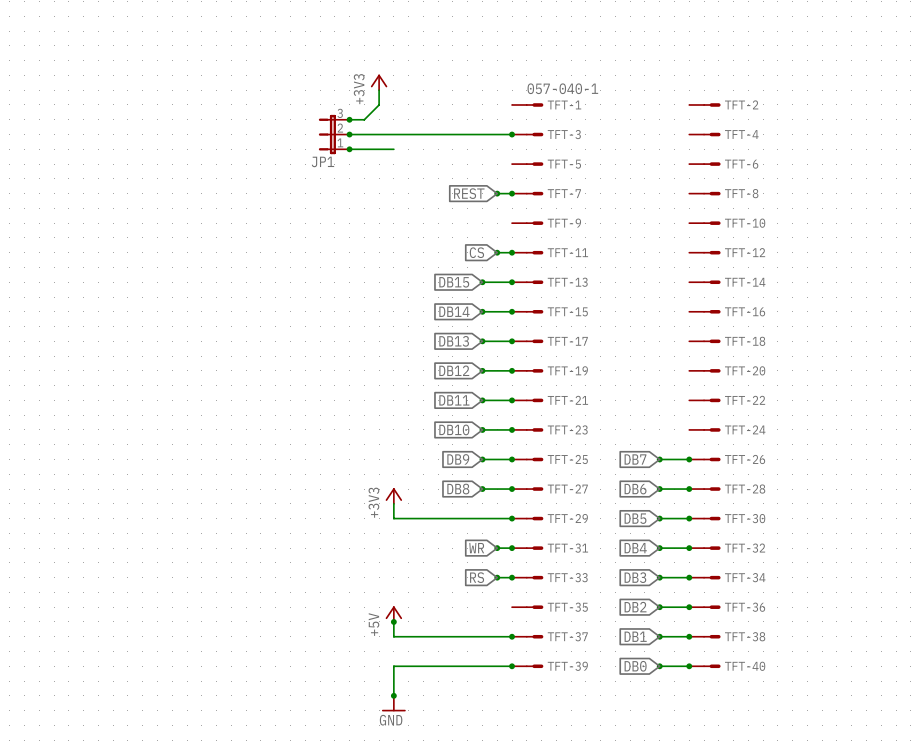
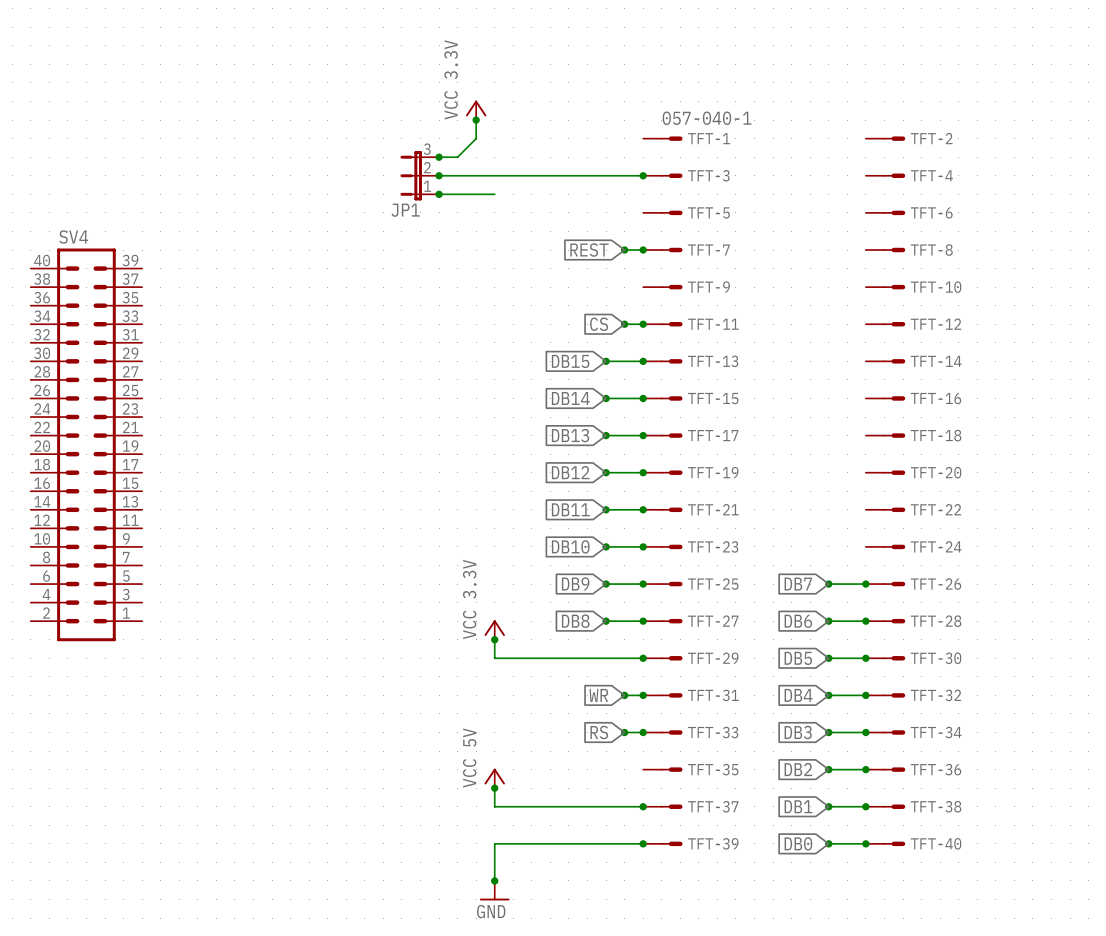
power symbol: +3V3 (379, 82) -> VCC 3.3V (476, 110)
junction: none -> (476, 120)
SV4: none -> (86, 444)
power symbol: +3V3 (393, 496) -> VCC 3.3V (494, 629)
junction: none -> (494, 639)
power symbol: +5V (393, 614) -> VCC 5V (494, 778)

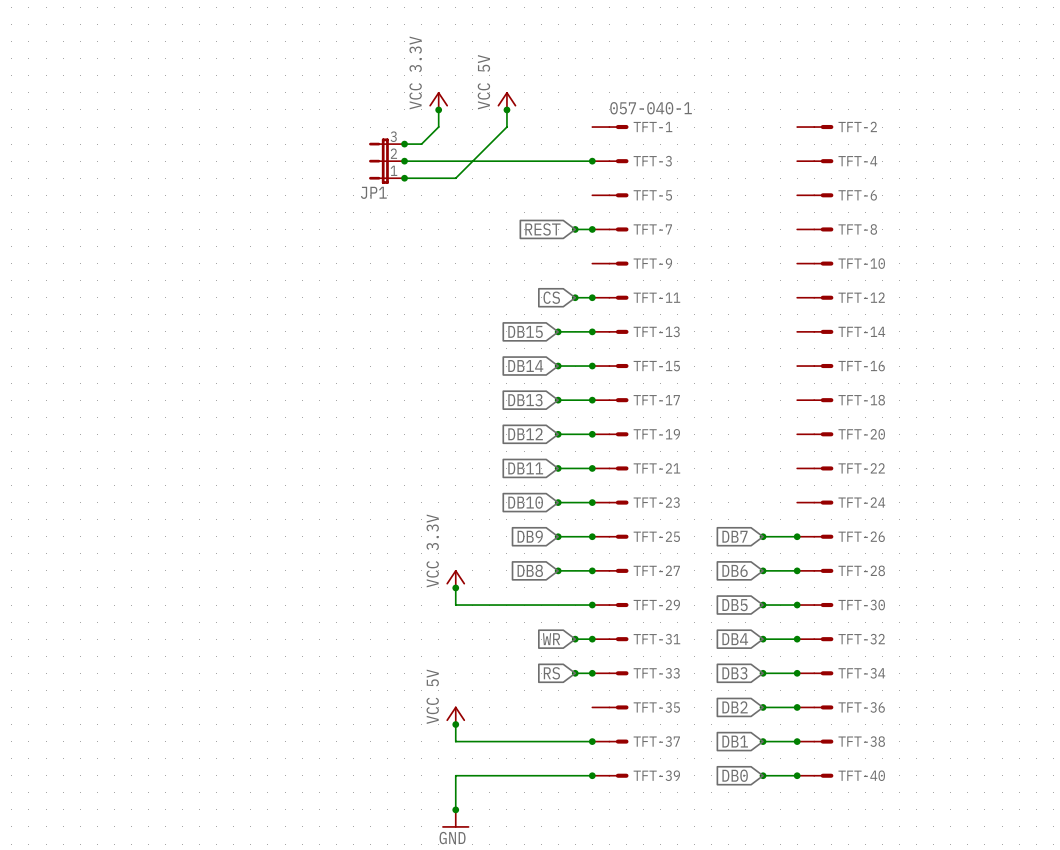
power symbol: none -> VCC 5V (506, 100)
wire: none -> (506, 109) (506, 127) (455, 178)
junction: none -> (506, 109)
SV4: (86, 444) -> none

